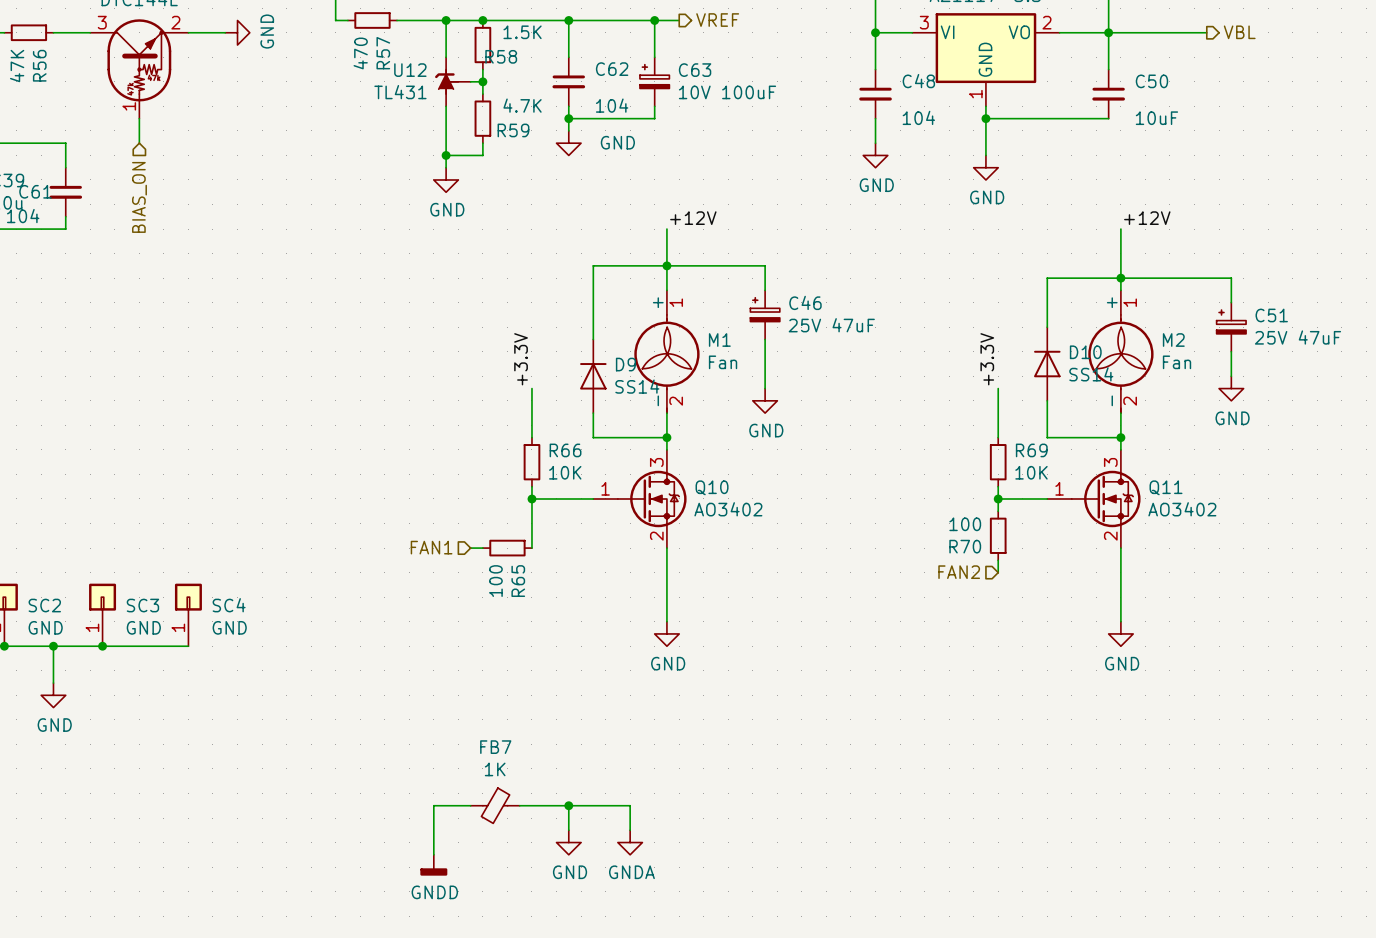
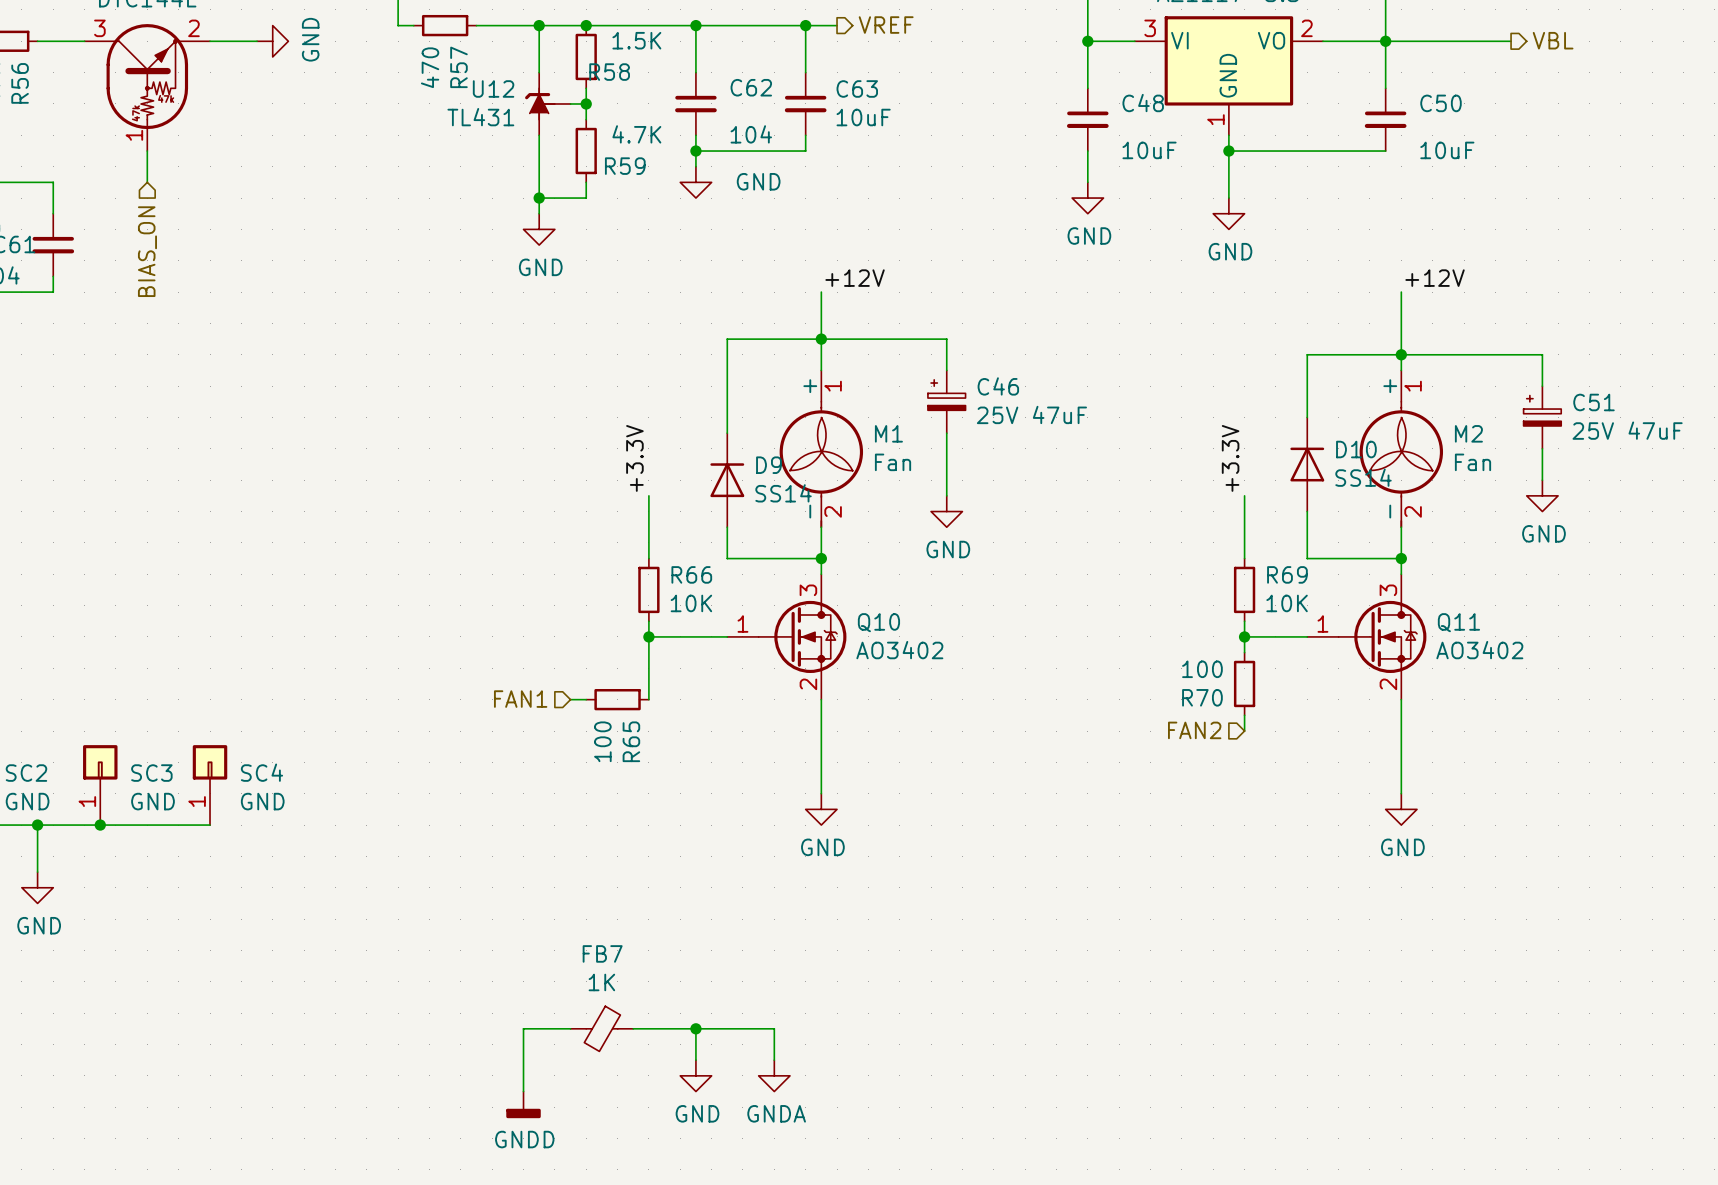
C63 symbol: [639, 57, 670, 107] -> [784, 72, 827, 136]
C63 value: 10V 100uF (727, 92) -> 10uF (863, 117)
C48 value: 104 (918, 117) -> 10uF (1149, 150)

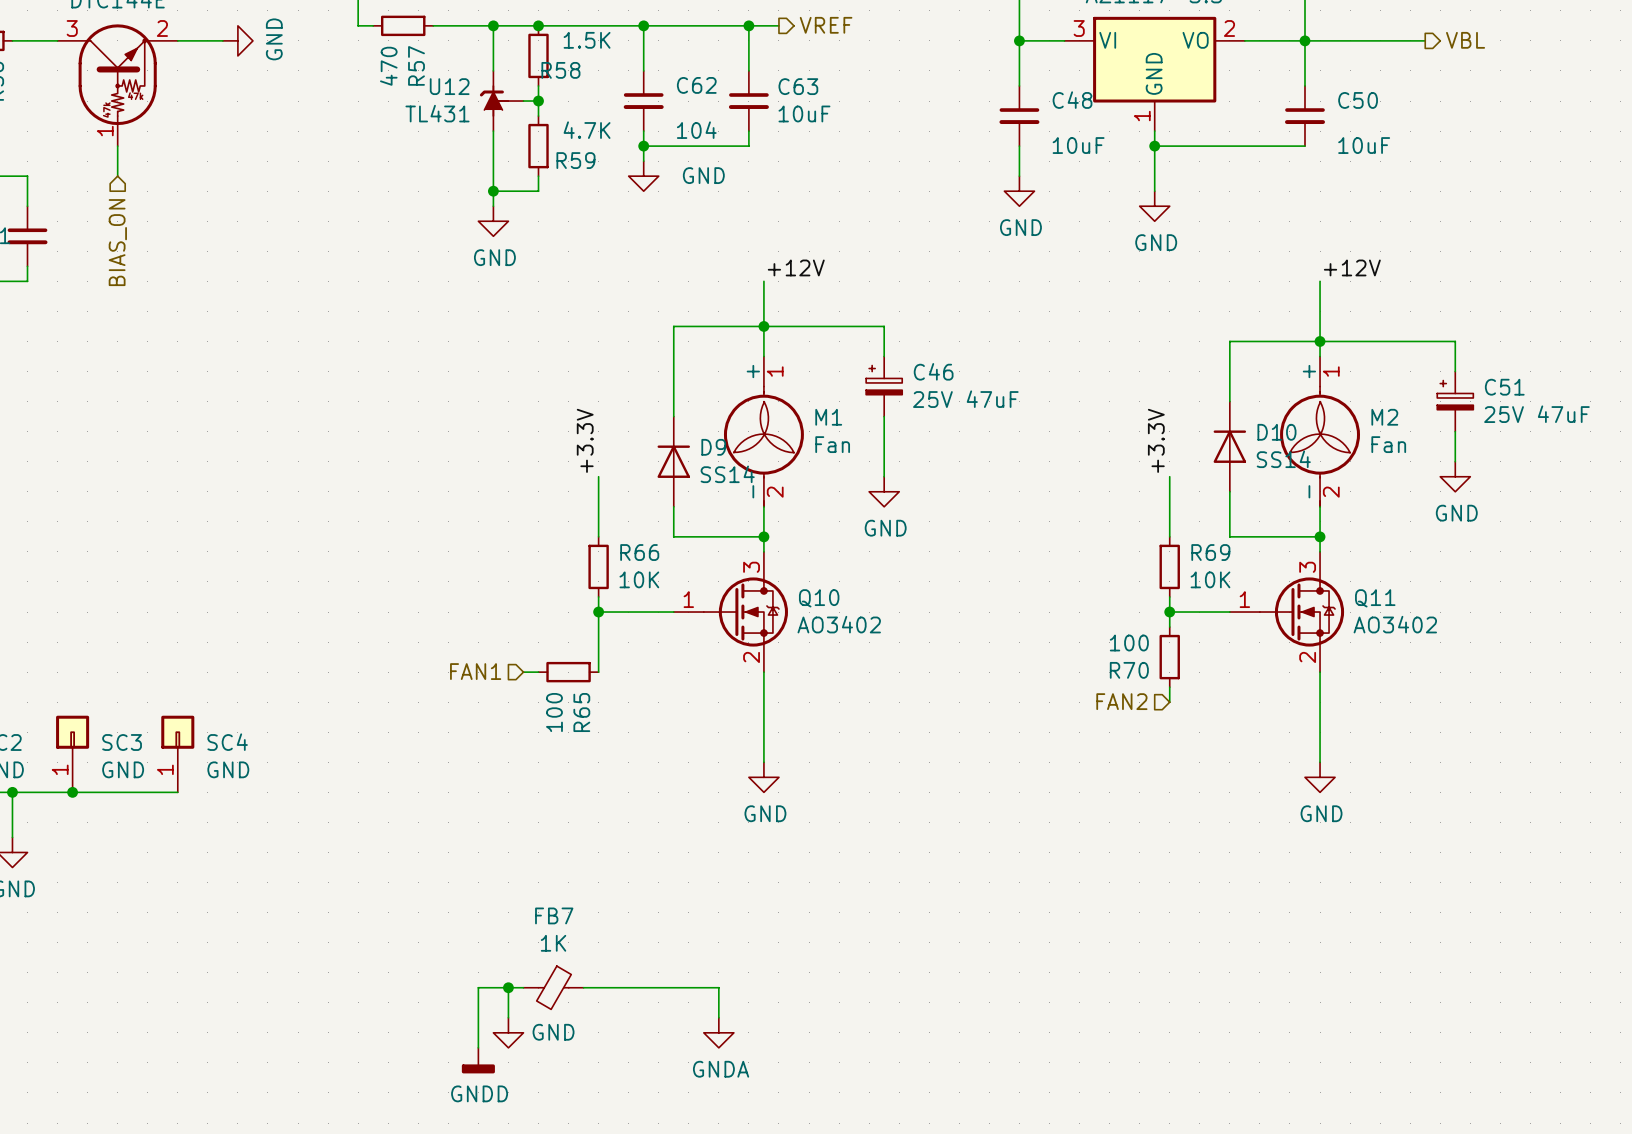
junction: none -> (508, 987)
wire: (695, 1028) (695, 1060) -> (508, 987) (508, 1017)
junction: (695, 1028) -> none
power symbol position: GND (695, 1075) -> GND (508, 1032)
power symbol text position: GND (697, 1113) -> GND (553, 1032)

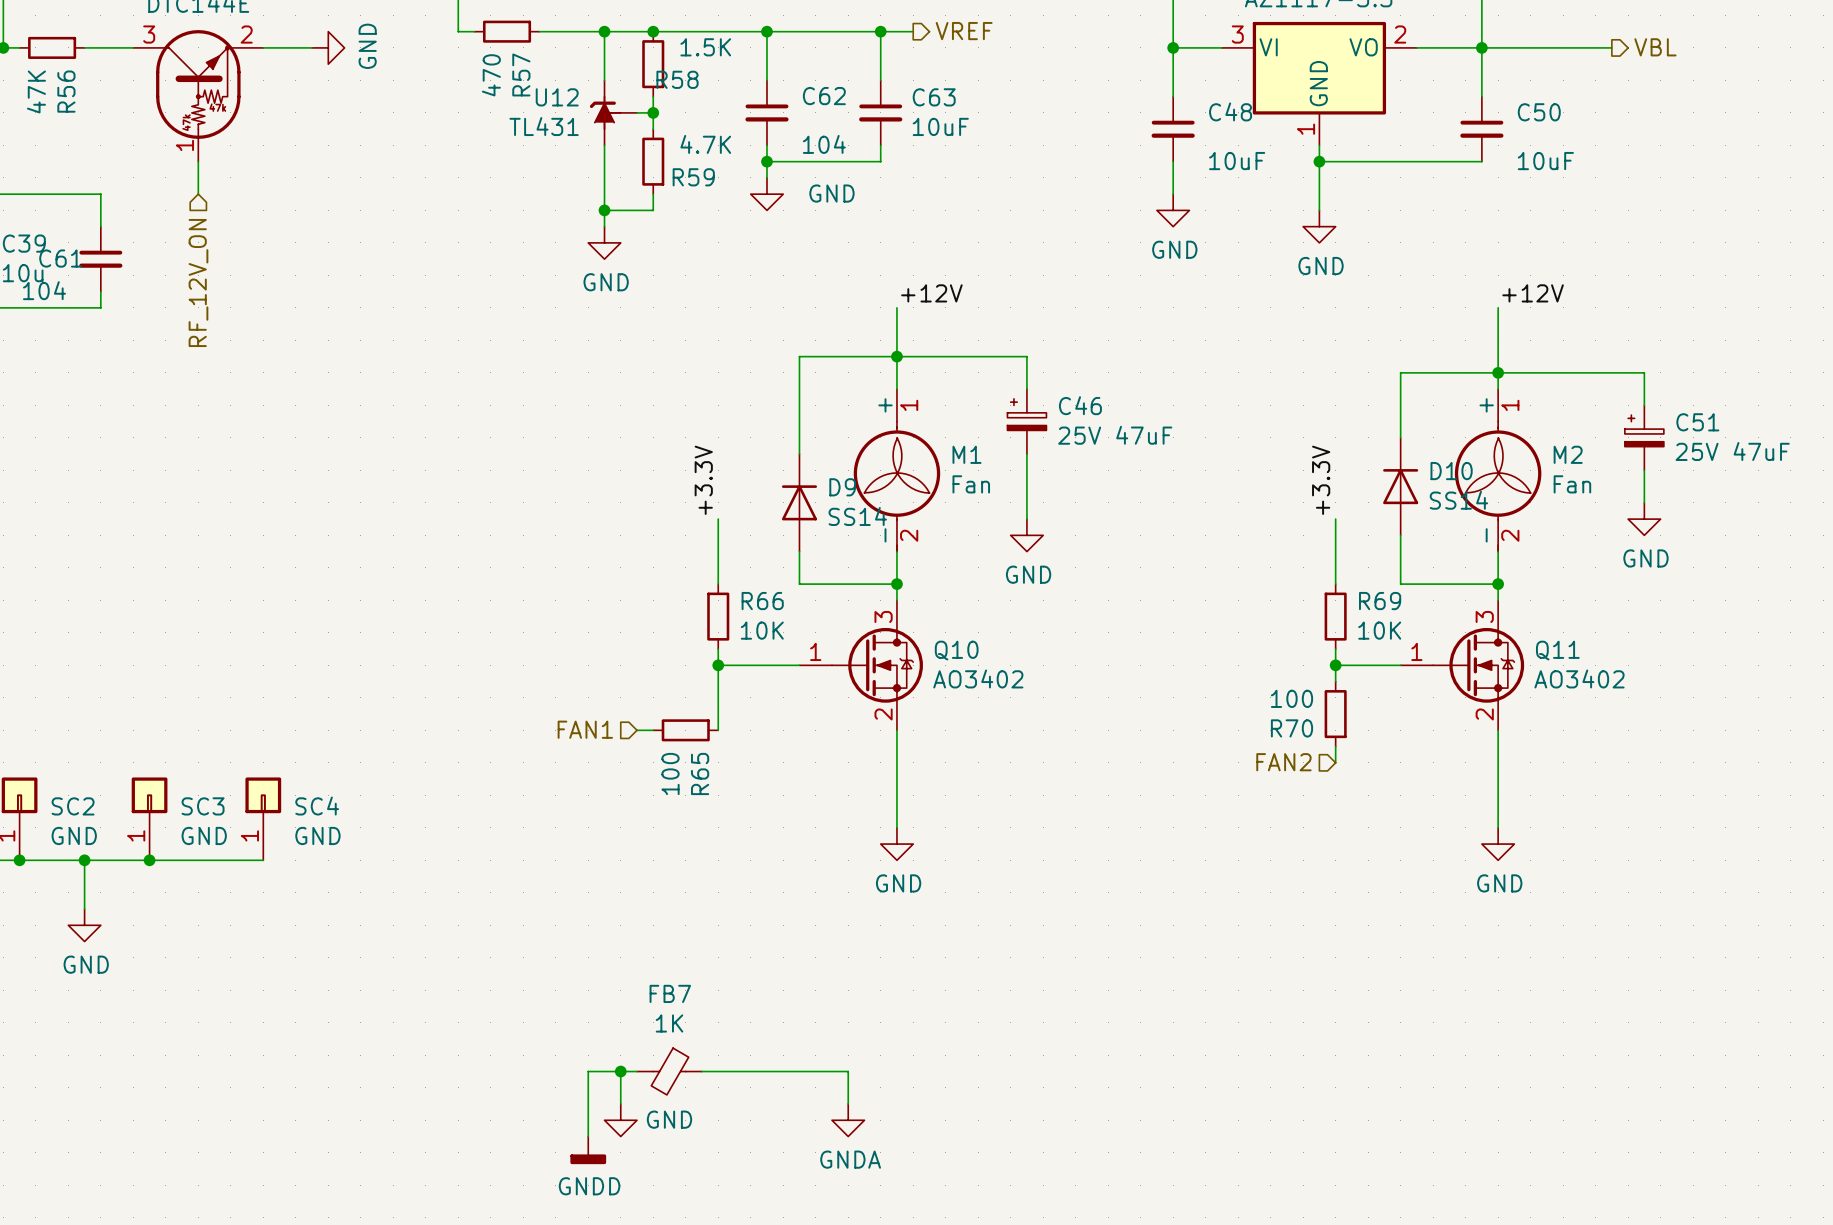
hierarchical label: BIAS_ON (117, 242) -> RF_12V_ON (198, 283)

